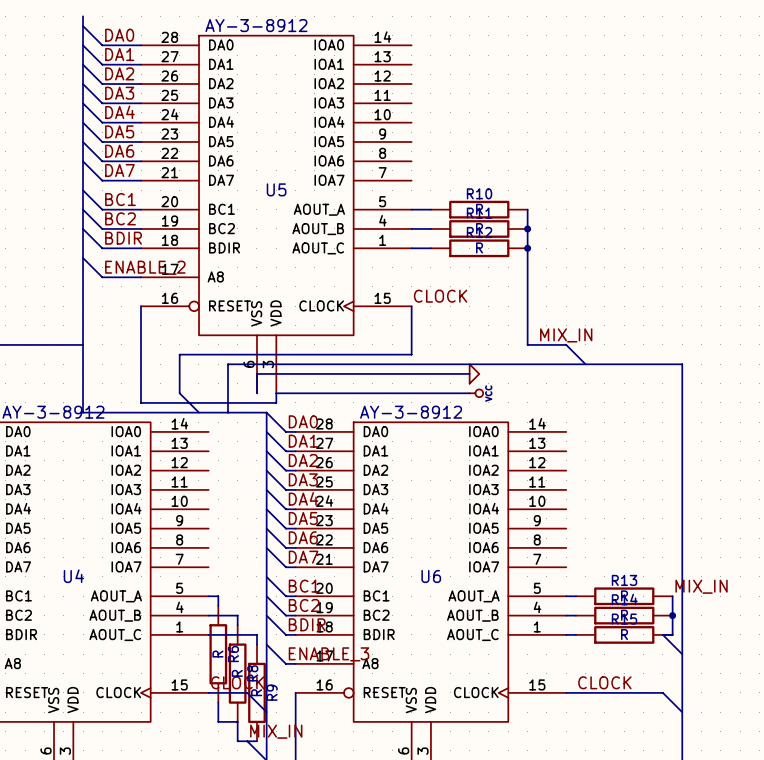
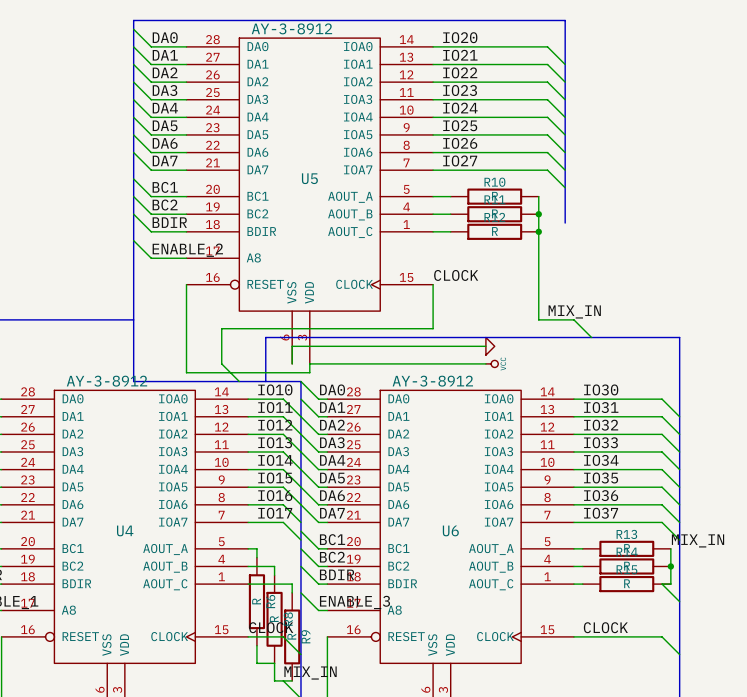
bus: none -> (133, 20) (565, 20) (565, 223)
label: none -> IO20 (460, 37)
wire: none -> (433, 46) (547, 46) (565, 64)
label: none -> IO21 (460, 55)
wire: none -> (433, 64) (547, 64) (565, 82)
label: none -> IO22 (460, 72)
wire: none -> (433, 82) (547, 82) (565, 99)
label: none -> IO23 (460, 90)
wire: none -> (433, 99) (547, 99) (565, 117)
label: none -> IO24 (460, 108)
wire: none -> (433, 117) (547, 117) (565, 134)
label: none -> IO25 (460, 125)
wire: none -> (433, 134) (547, 134) (565, 152)
label: none -> IO26 (460, 143)
wire: none -> (433, 152) (547, 152) (565, 170)
label: none -> IO27 (460, 160)
wire: none -> (433, 170) (547, 170) (565, 187)
label: none -> IO10 (275, 389)
label: none -> IO30 (601, 389)
wire: none -> (248, 399) (283, 399) (300, 416)
wire: none -> (573, 399) (662, 399) (679, 416)
label: none -> IO11 (275, 407)
label: none -> IO31 (601, 407)
wire: none -> (248, 416) (283, 416) (300, 434)
wire: none -> (573, 416) (662, 416) (679, 434)
label: none -> IO12 (275, 425)
label: none -> IO32 (601, 425)
wire: none -> (248, 434) (283, 434) (300, 451)
wire: none -> (573, 434) (662, 434) (679, 451)
label: none -> IO13 (275, 442)
label: none -> IO33 (600, 442)
wire: none -> (248, 451) (283, 451) (300, 469)
wire: none -> (573, 451) (662, 451) (679, 469)
label: none -> IO14 (275, 460)
label: none -> IO34 (601, 460)
wire: none -> (248, 469) (283, 469) (300, 487)
wire: none -> (573, 469) (662, 469) (679, 487)
label: none -> IO15 (275, 478)
label: none -> IO35 (601, 478)
wire: none -> (248, 487) (283, 487) (300, 504)
wire: none -> (573, 487) (662, 487) (679, 504)
label: none -> IO16 (275, 495)
label: none -> IO36 (601, 495)
wire: none -> (248, 504) (283, 504) (300, 522)
wire: none -> (573, 504) (662, 504) (679, 522)
label: none -> IO17 (275, 513)
label: none -> IO37 (601, 513)
wire: none -> (248, 522) (283, 522) (300, 540)
wire: none -> (573, 522) (662, 522) (679, 540)

